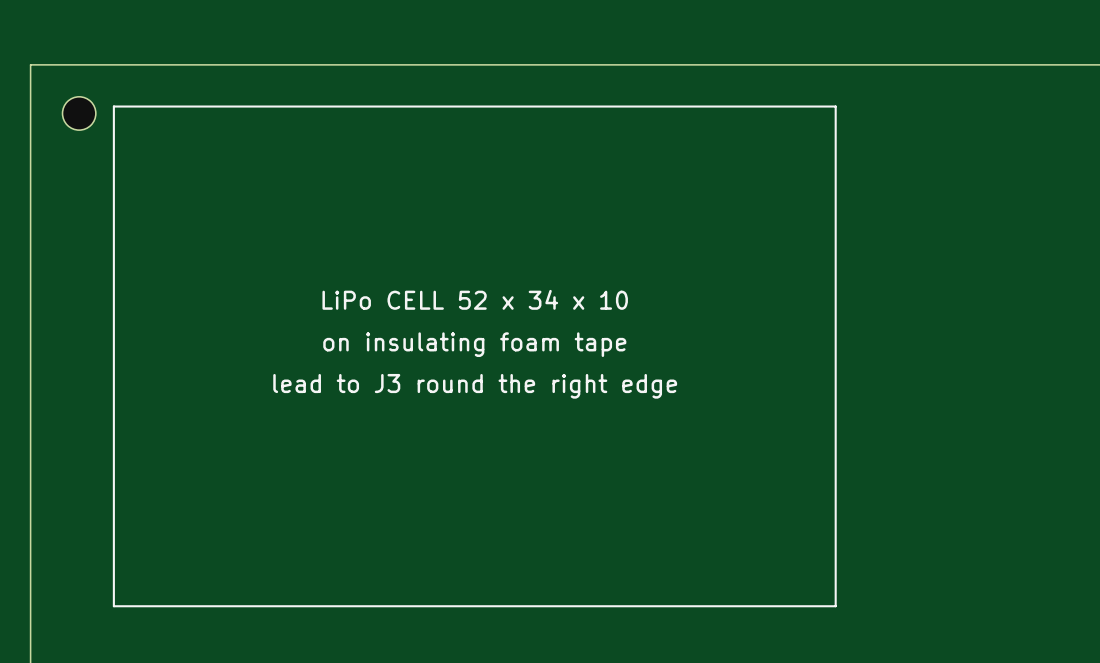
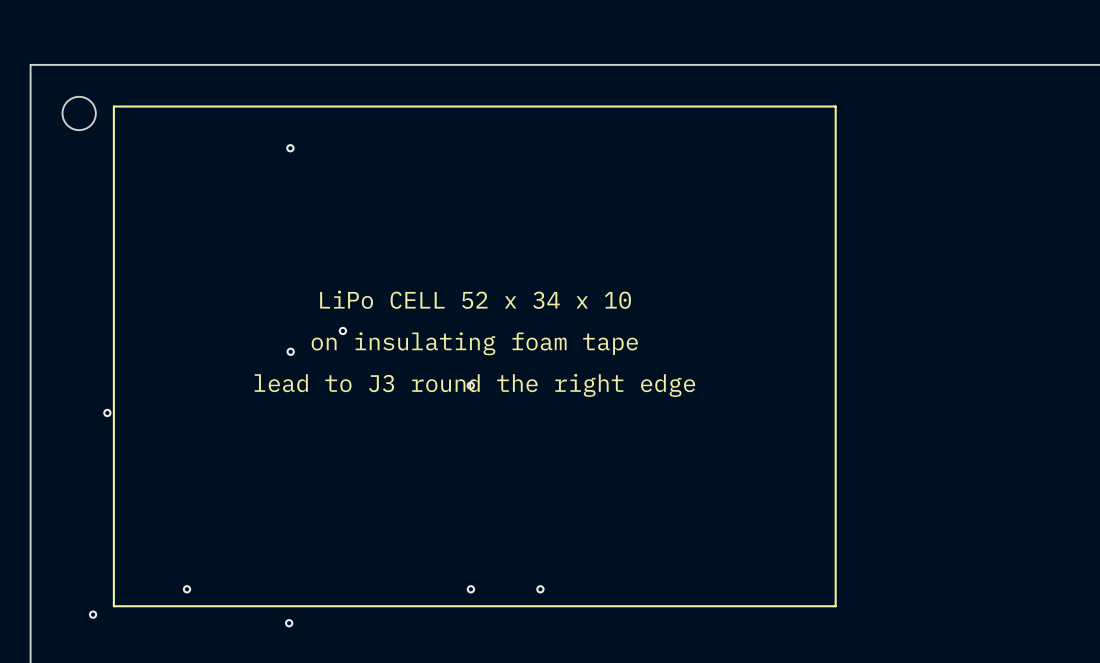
via: none -> (290, 148)
via: none -> (342, 330)
via: none -> (290, 351)
via: none -> (470, 385)
via: none -> (107, 412)
via: none -> (187, 589)
via: none -> (470, 589)
via: none -> (540, 589)
via: none -> (93, 614)
via: none -> (289, 623)

